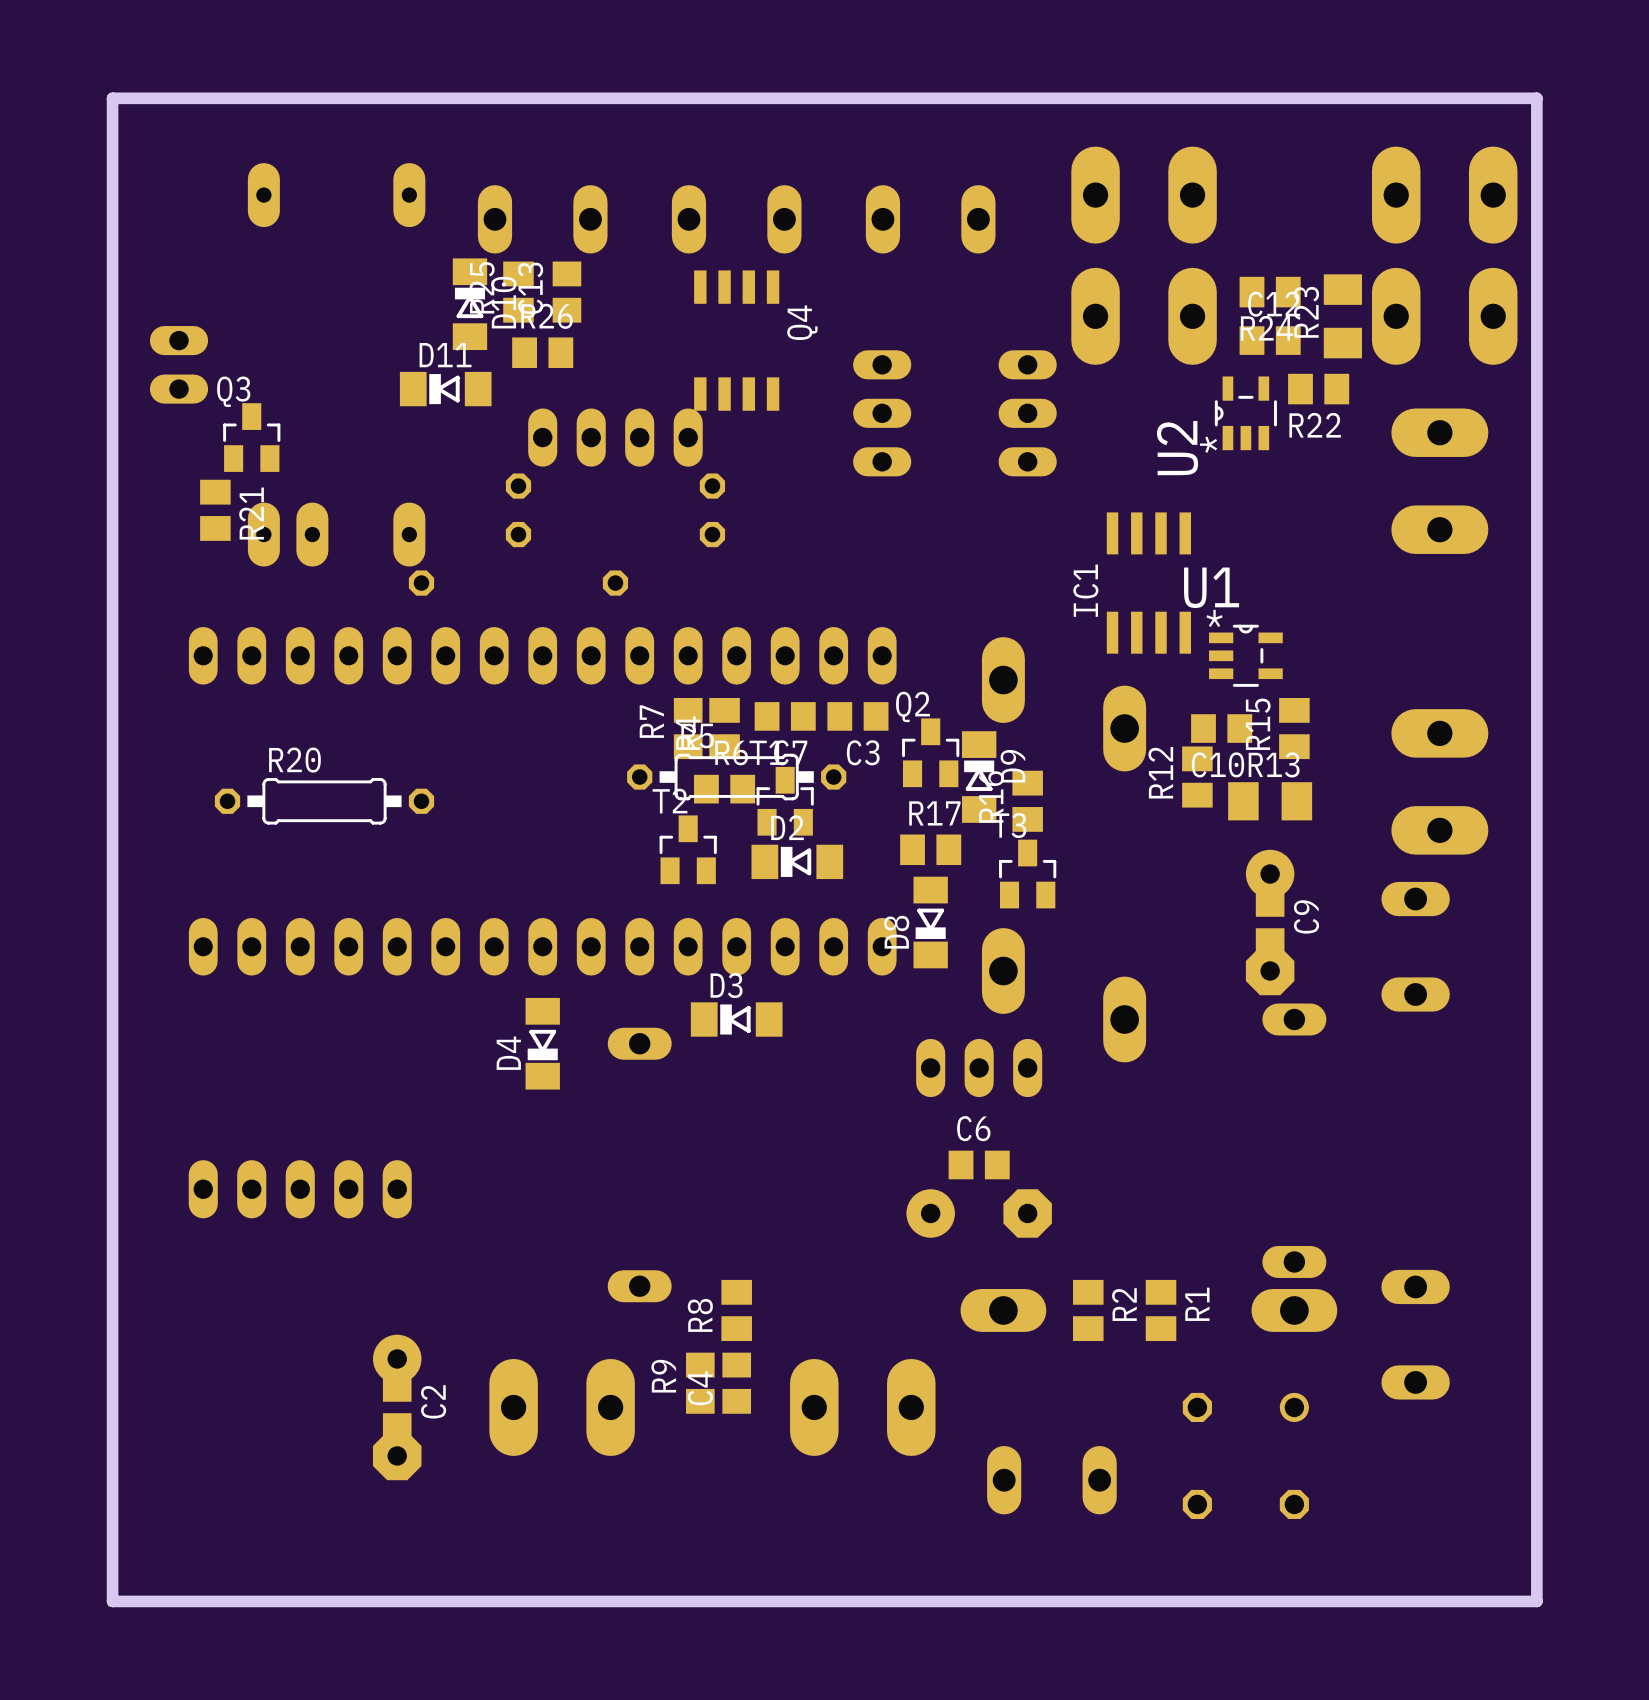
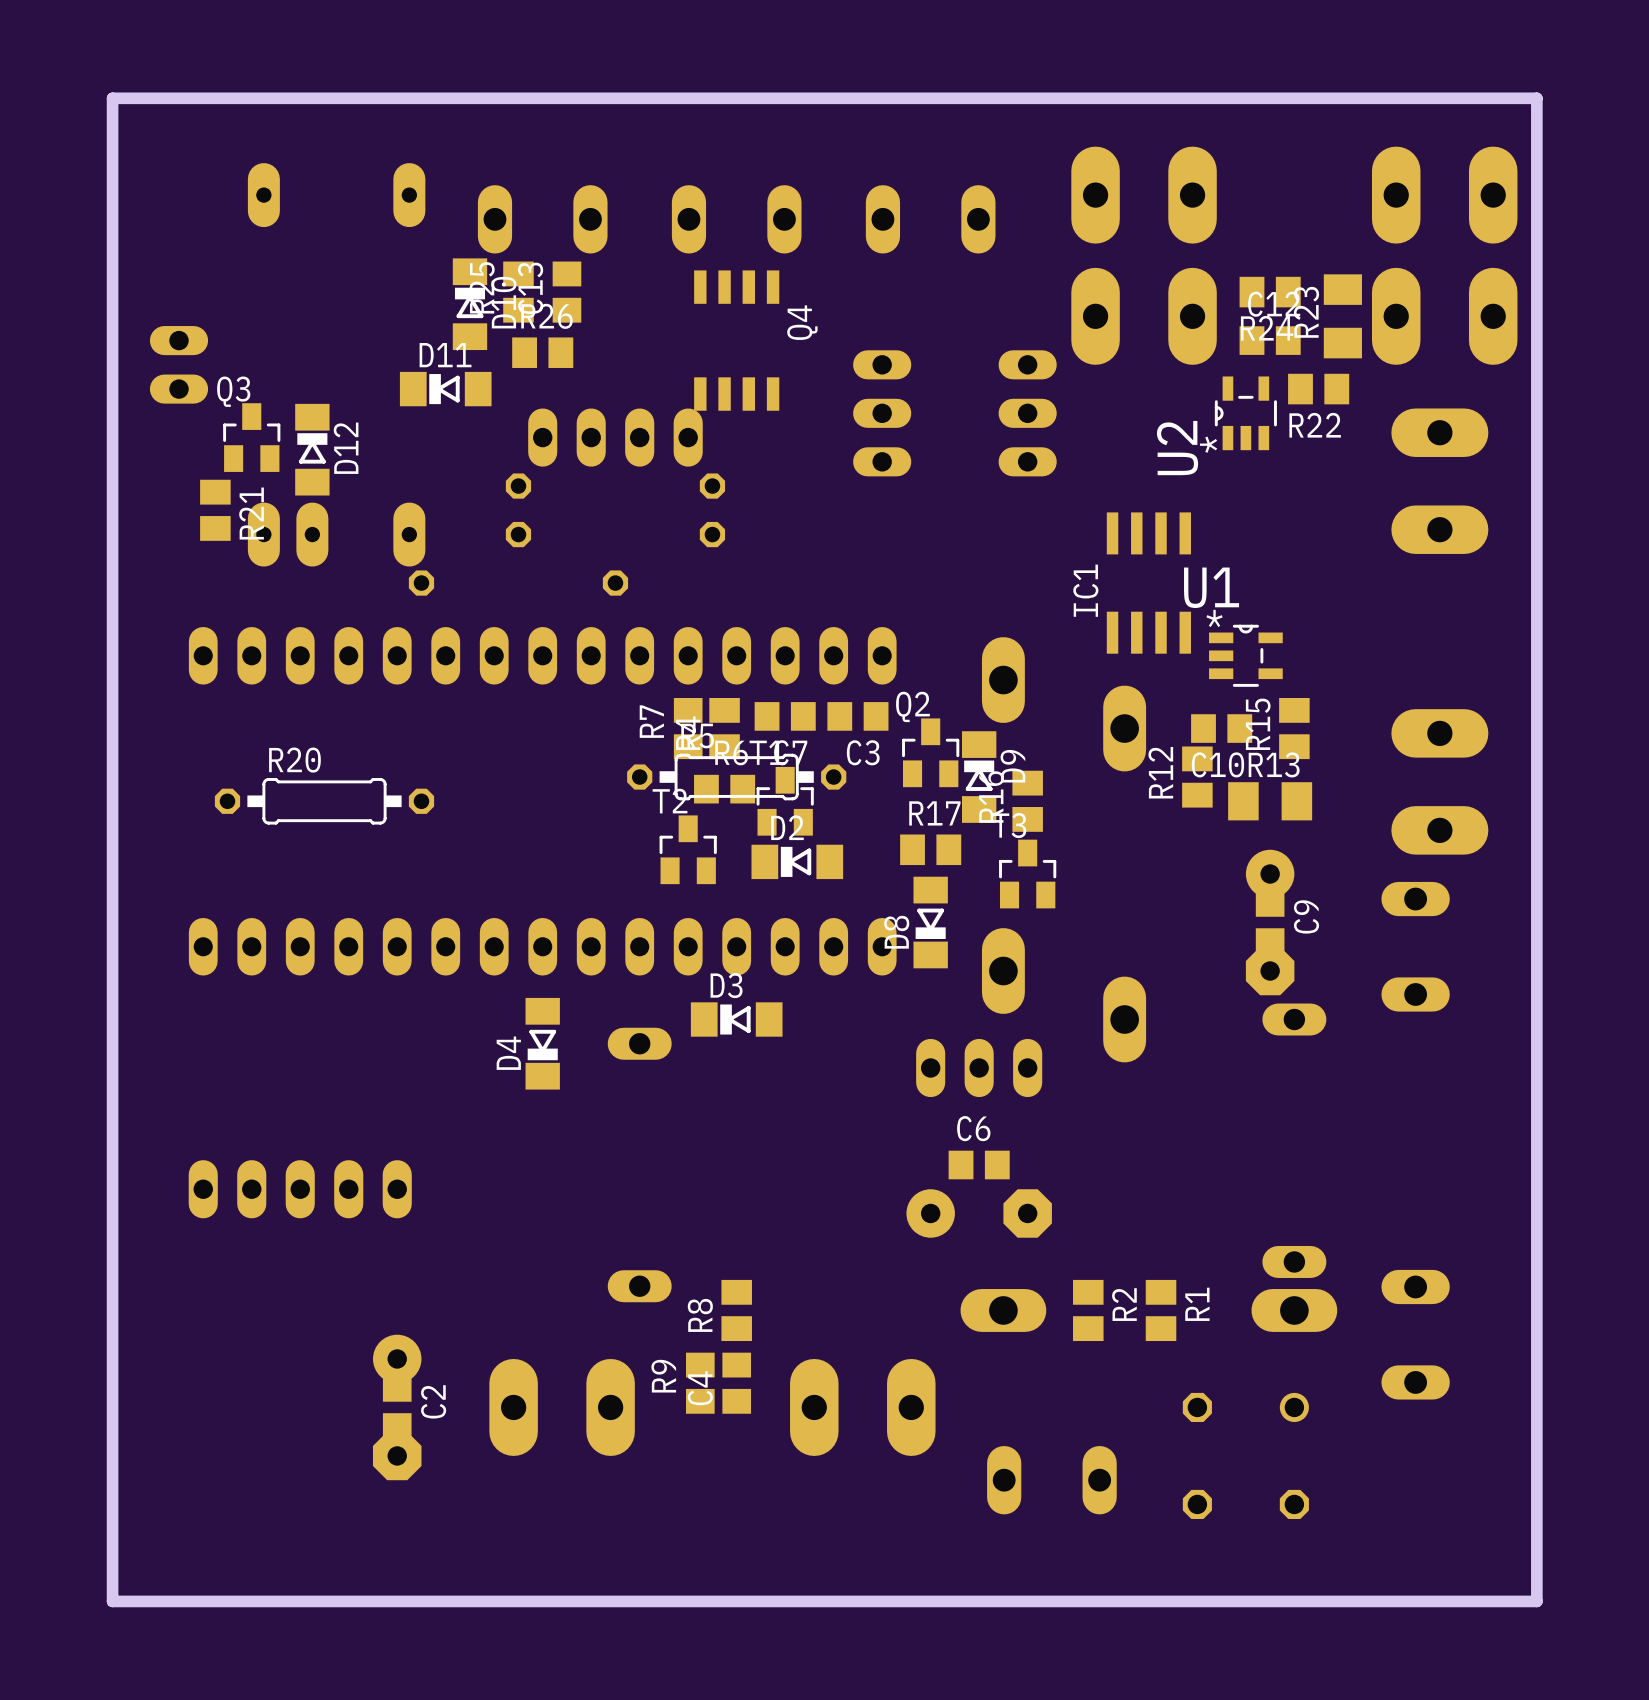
D12: none -> (312, 449)

